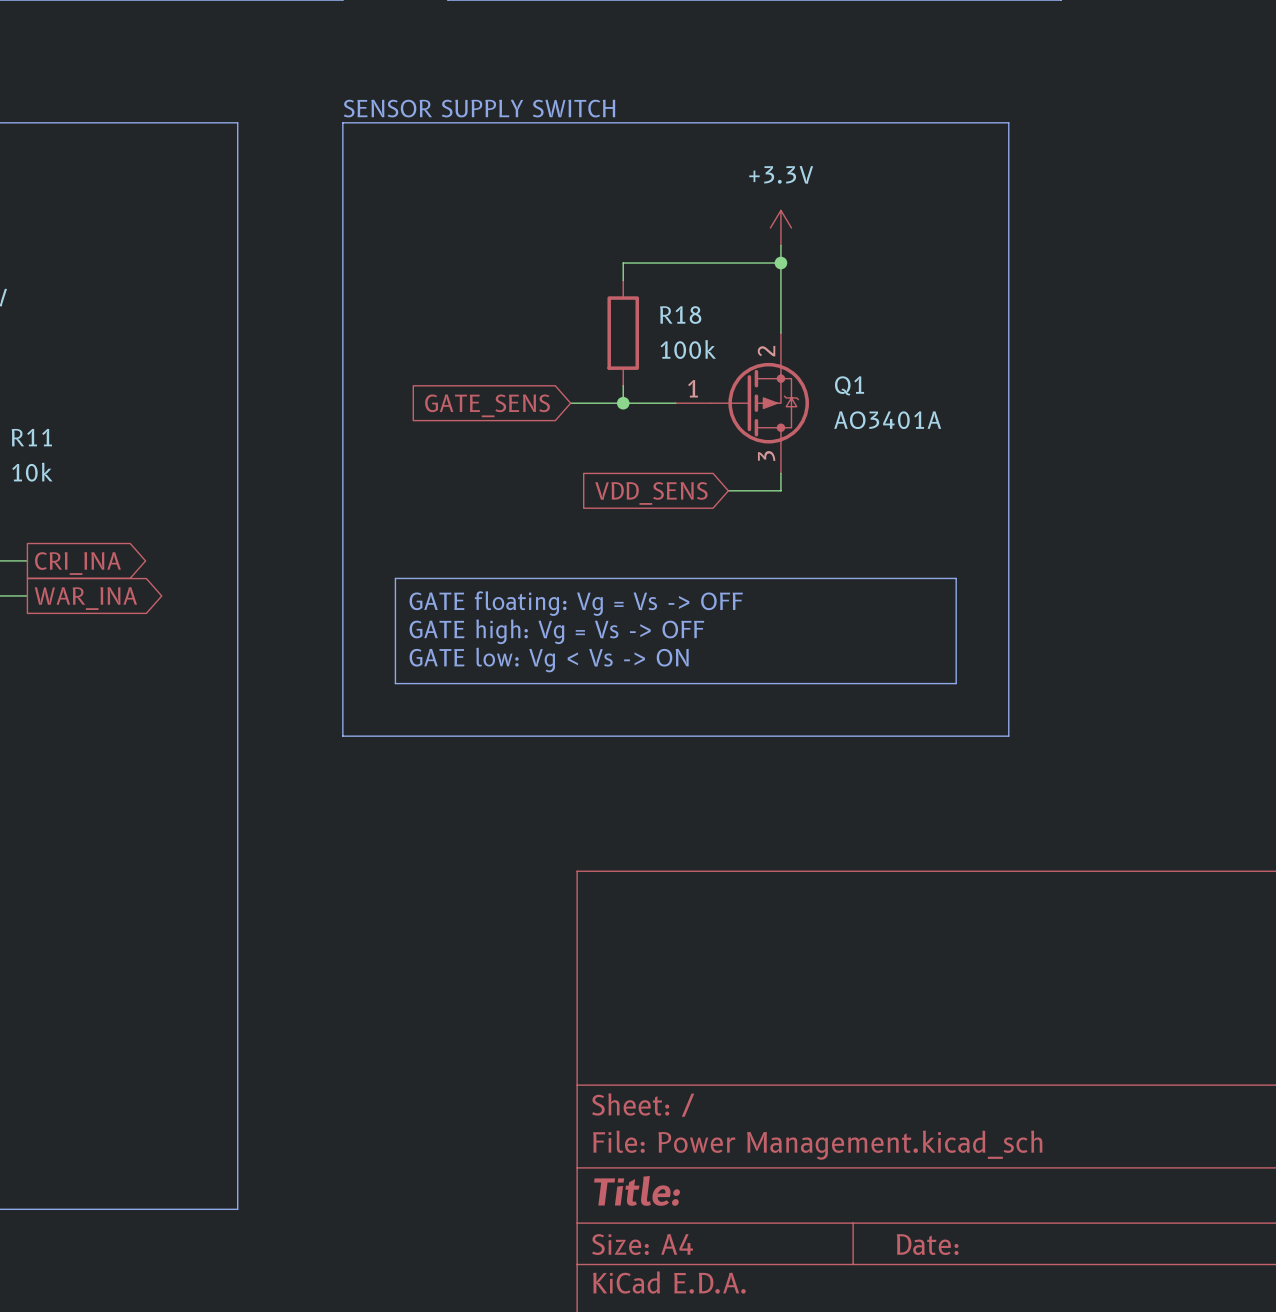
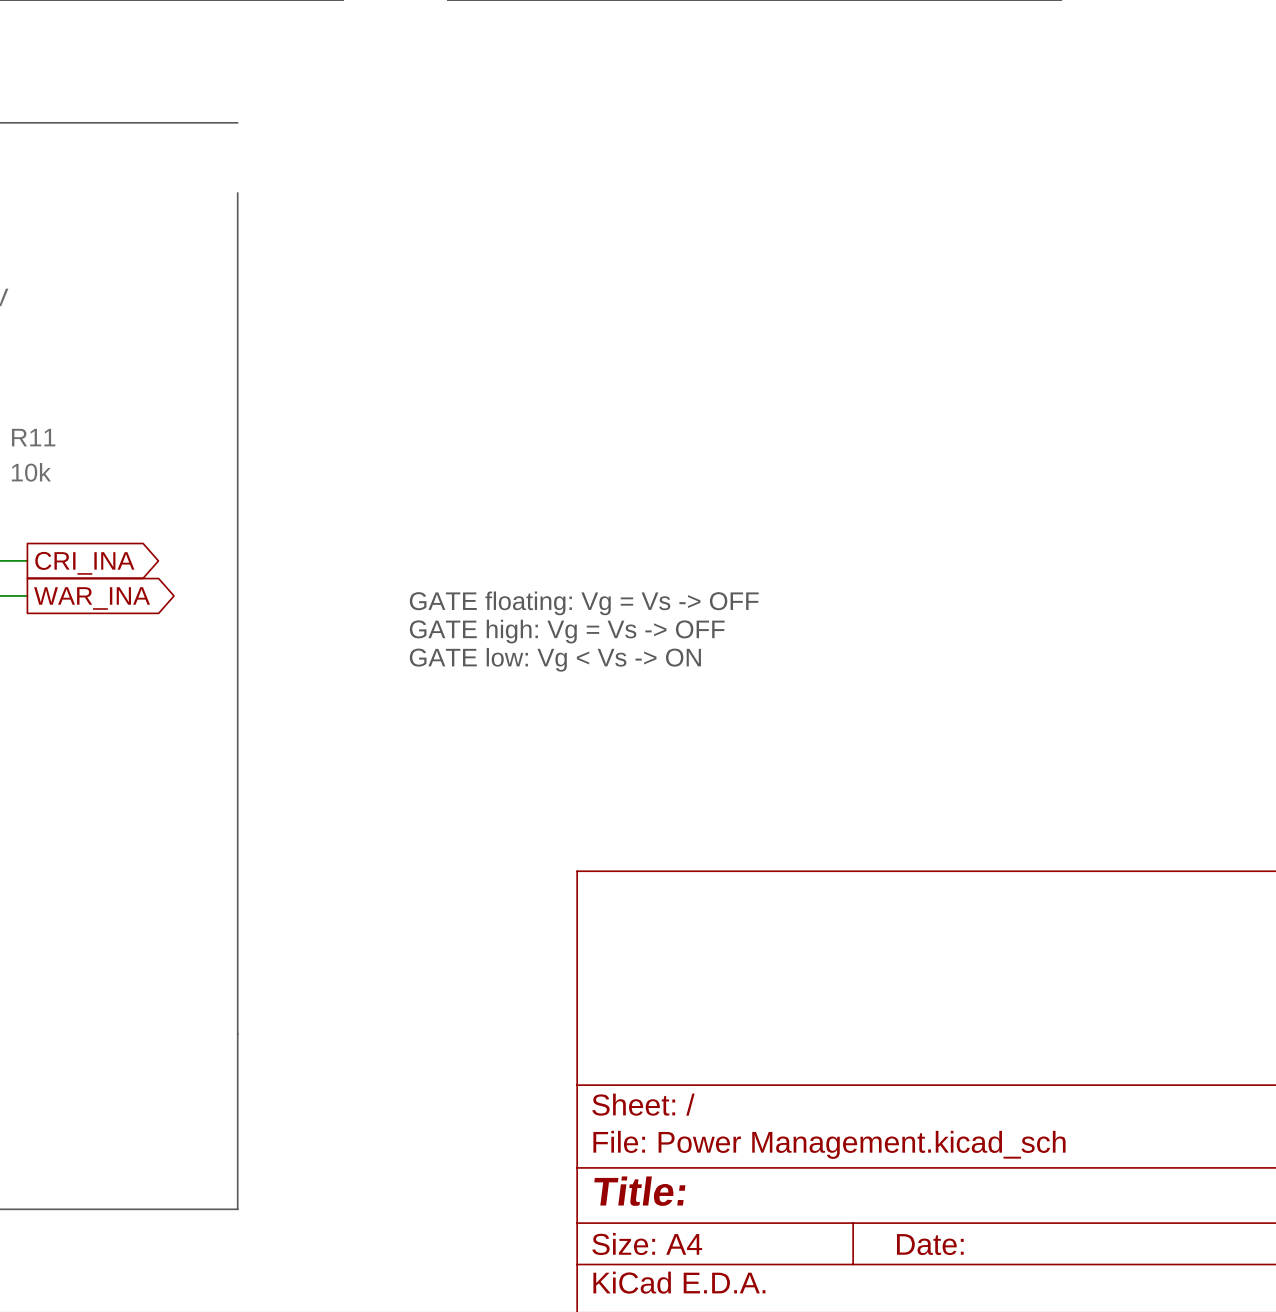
text: SENSOR SUPPLY SWITCH (479, 108) -> none
line: (237, 122) (237, 192) -> none
line: (342, 122) (342, 736) (1008, 736) (1008, 122) (342, 122) -> none
power symbol: +3.3V (780, 227) -> none
wire: (780, 245) (780, 333) -> none
wire: (780, 263) (623, 263) (623, 280) -> none
junction: (780, 263) -> none
R18: 100k (623, 333) -> none
wire: (623, 385) (623, 403) -> none
wire: (570, 403) (675, 403) -> none
junction: (623, 403) -> none
Q1: AO3401A (742, 403) -> none
global label: GATE_SENS (487, 405) -> none
wire: (780, 473) (780, 490) (728, 490) -> none
global label: VDD_SENS (651, 493) -> none
line: (395, 578) (956, 578) (956, 683) (395, 683) (395, 578) -> none

